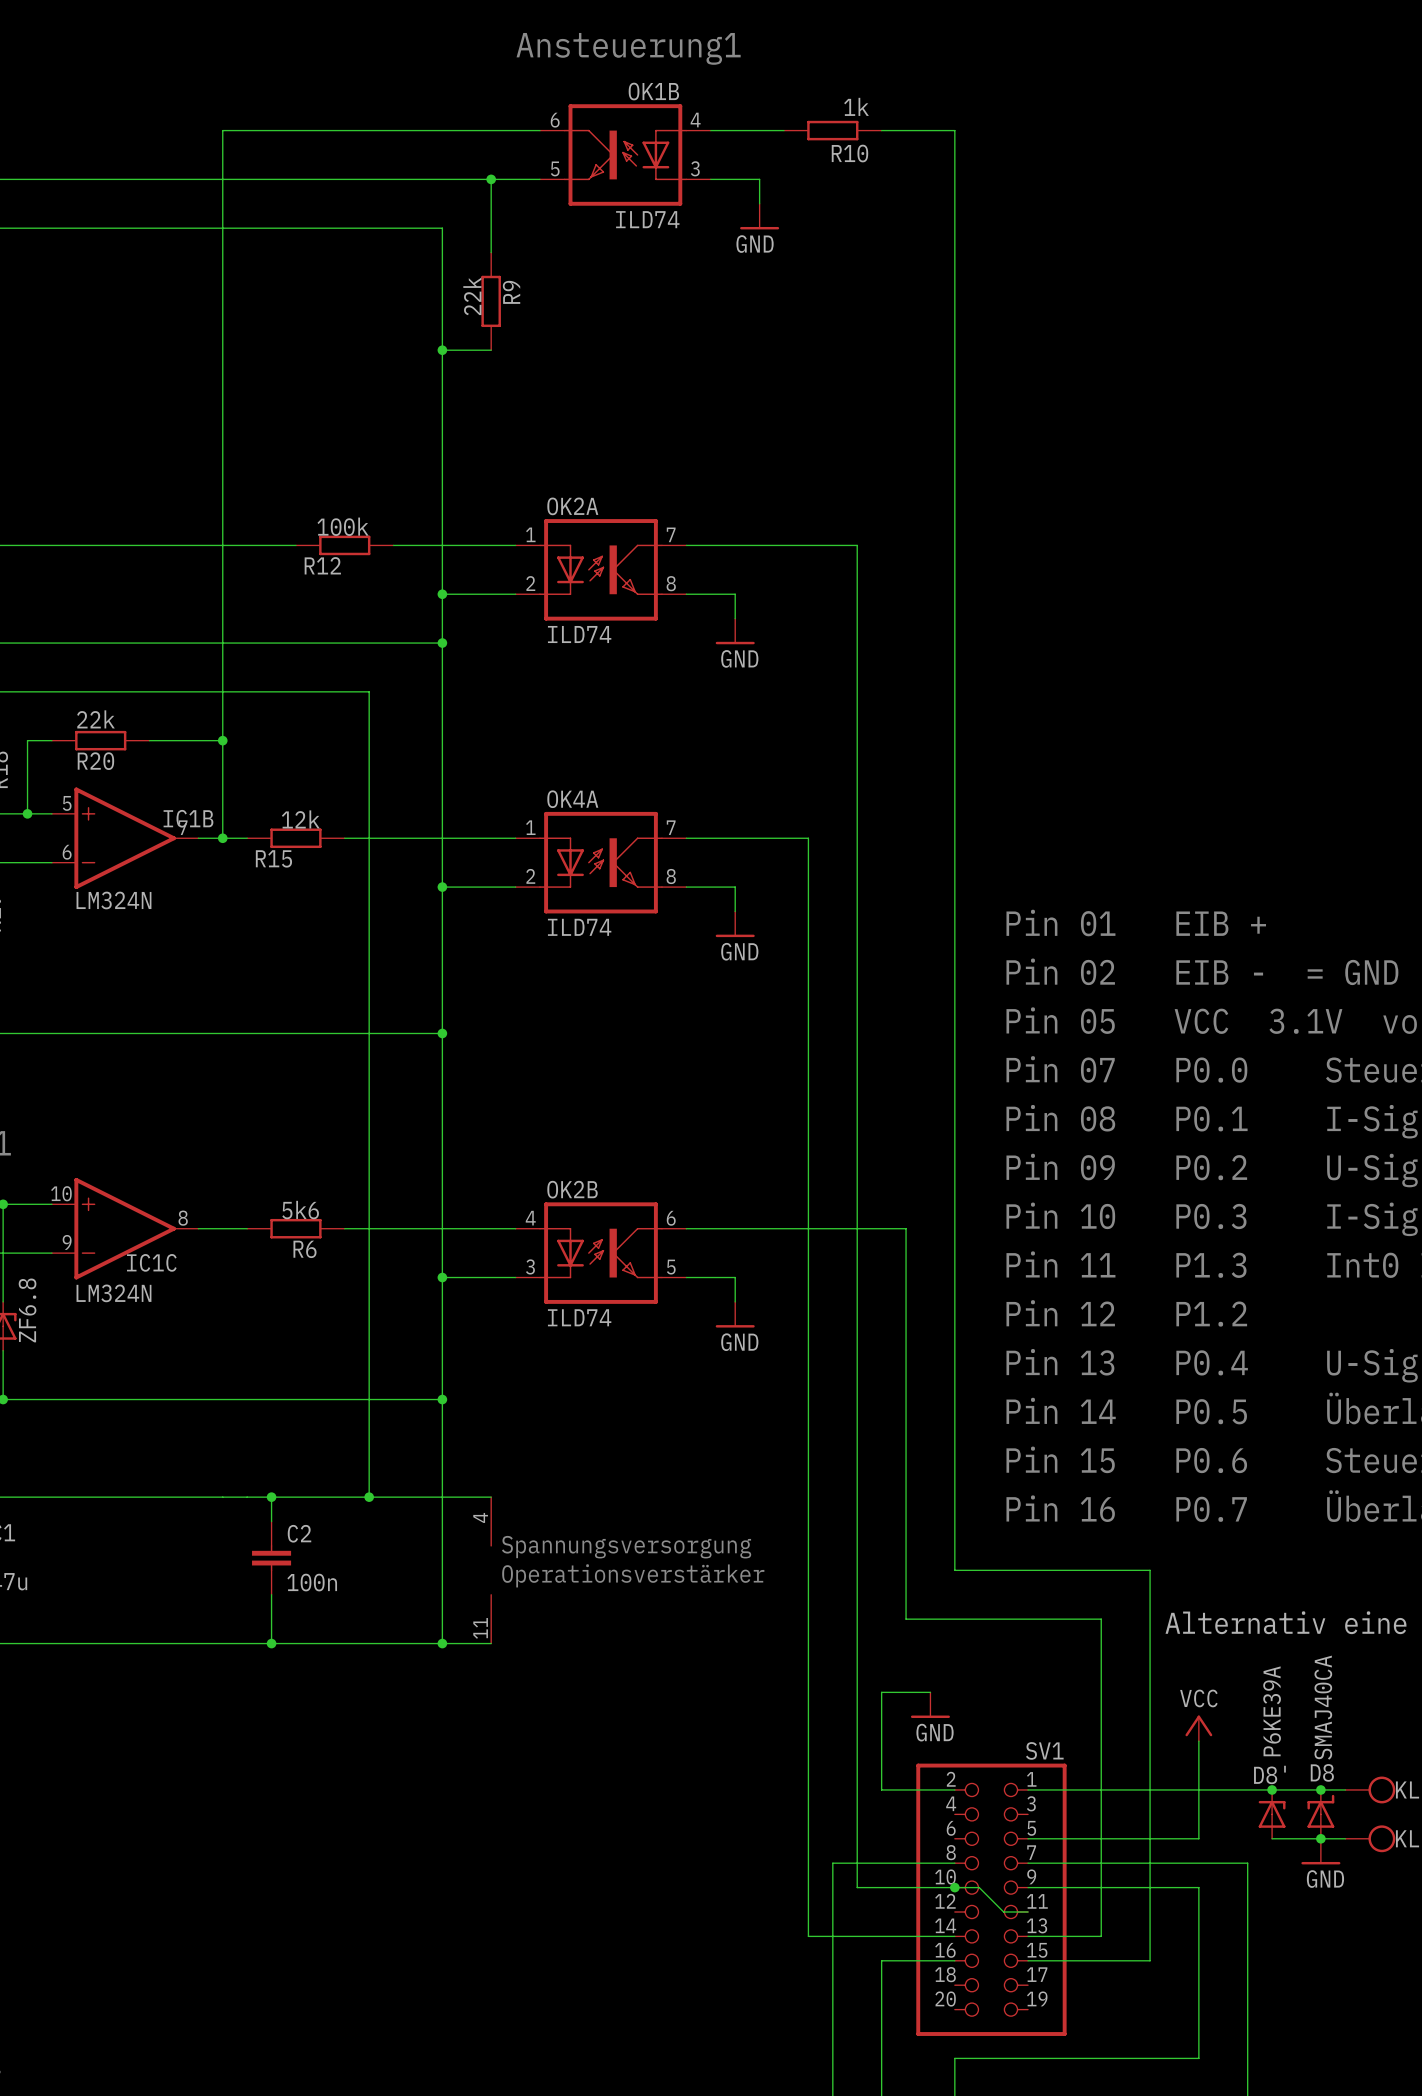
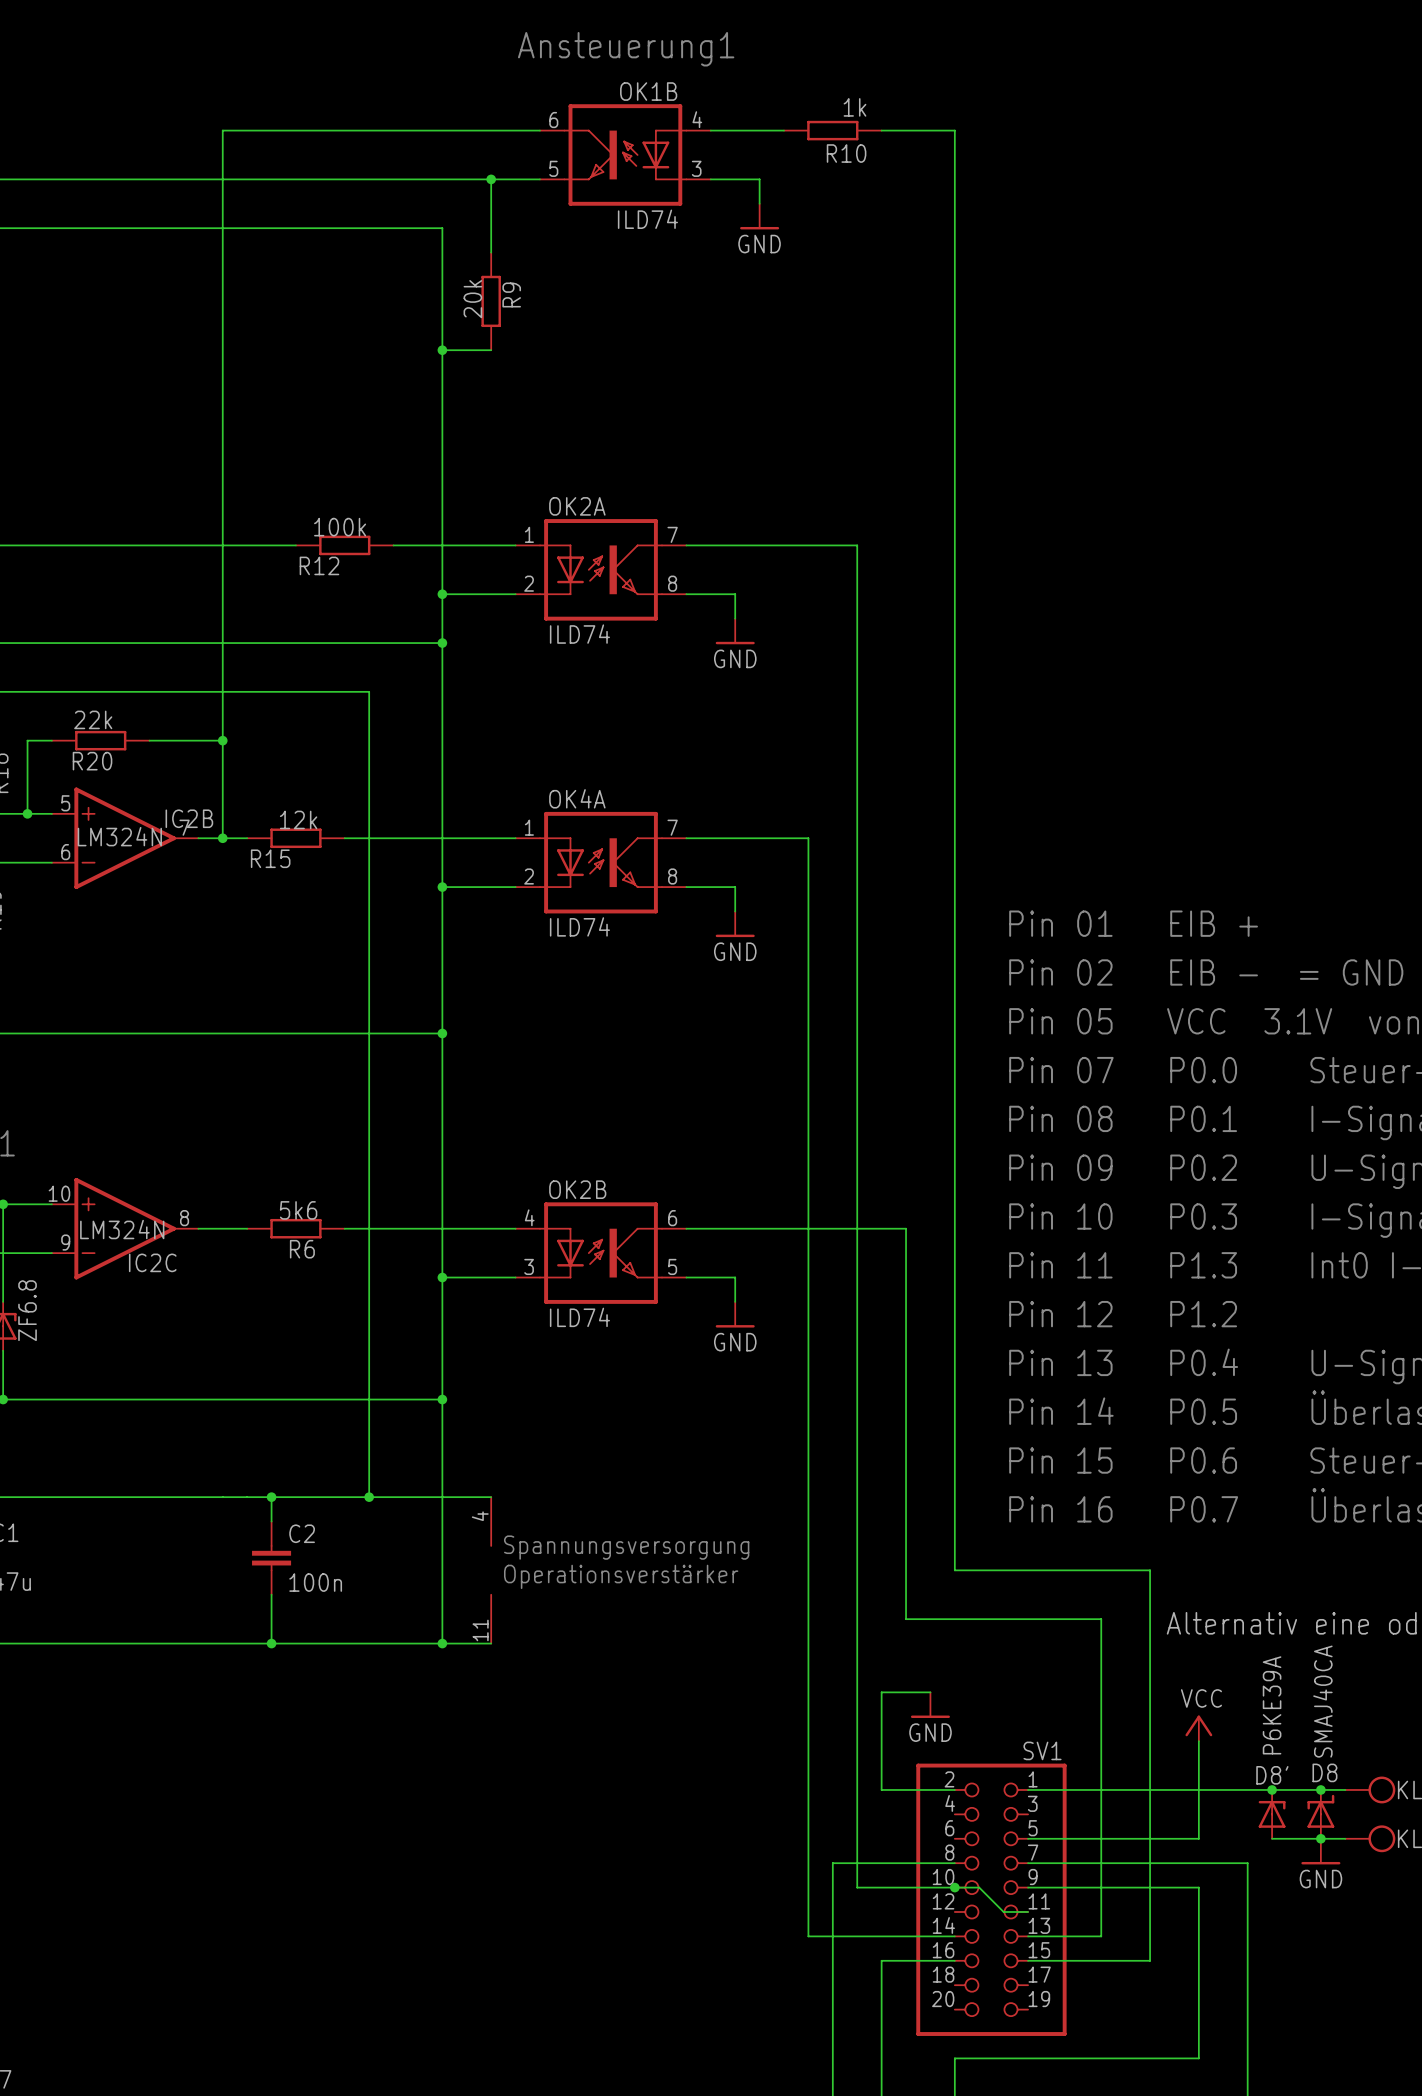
R9 value: 22k (472, 296) -> 20k (472, 299)
IC1B name: IC1B (188, 818) -> IC2B (189, 818)
IC1B value position: LM324N (113, 900) -> LM324N (119, 836)
IC1C name: IC1C (151, 1262) -> IC2C (152, 1262)
IC1C value position: LM324N (113, 1293) -> LM324N (122, 1229)

